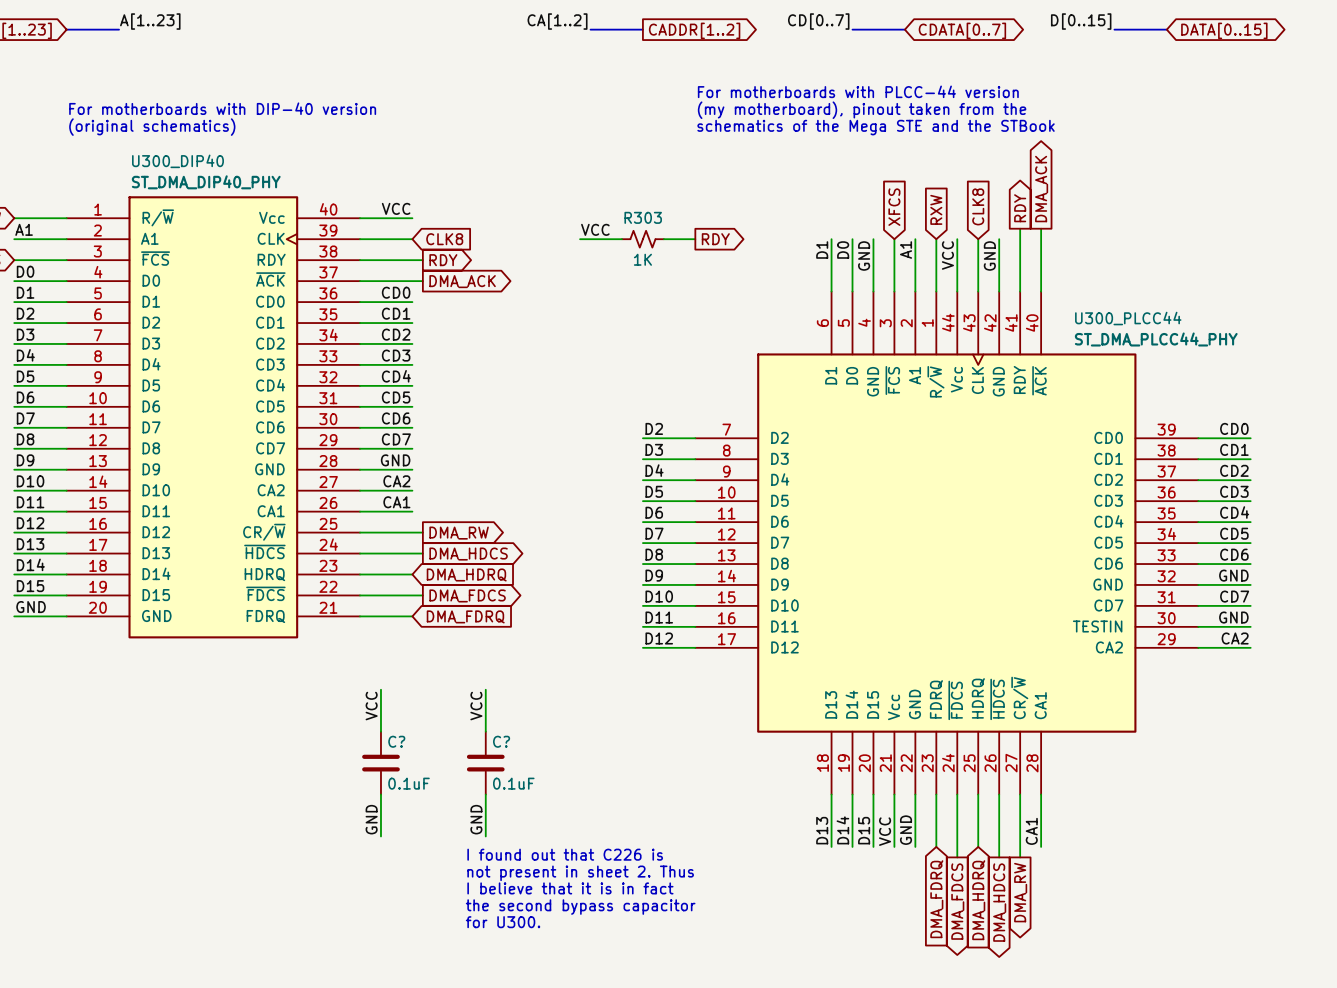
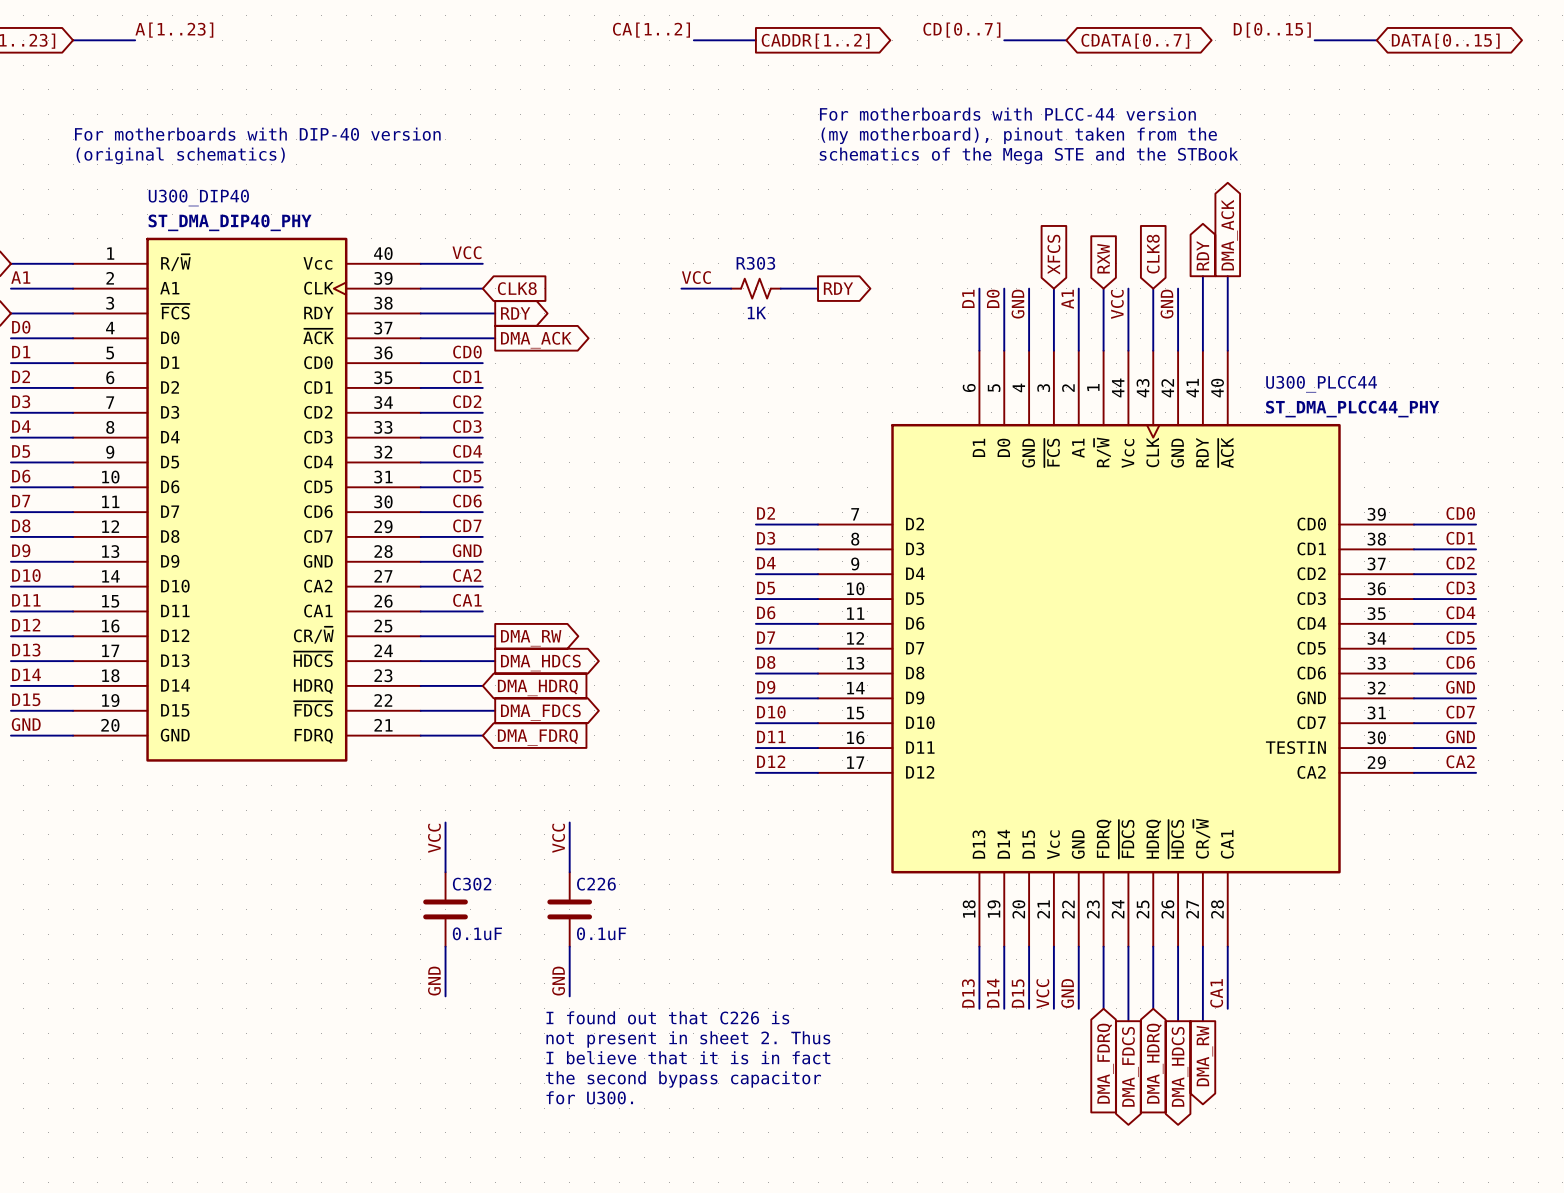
C? name: C? (396, 741) -> C302 (472, 884)
C? name: C? (501, 741) -> C226 (596, 884)

